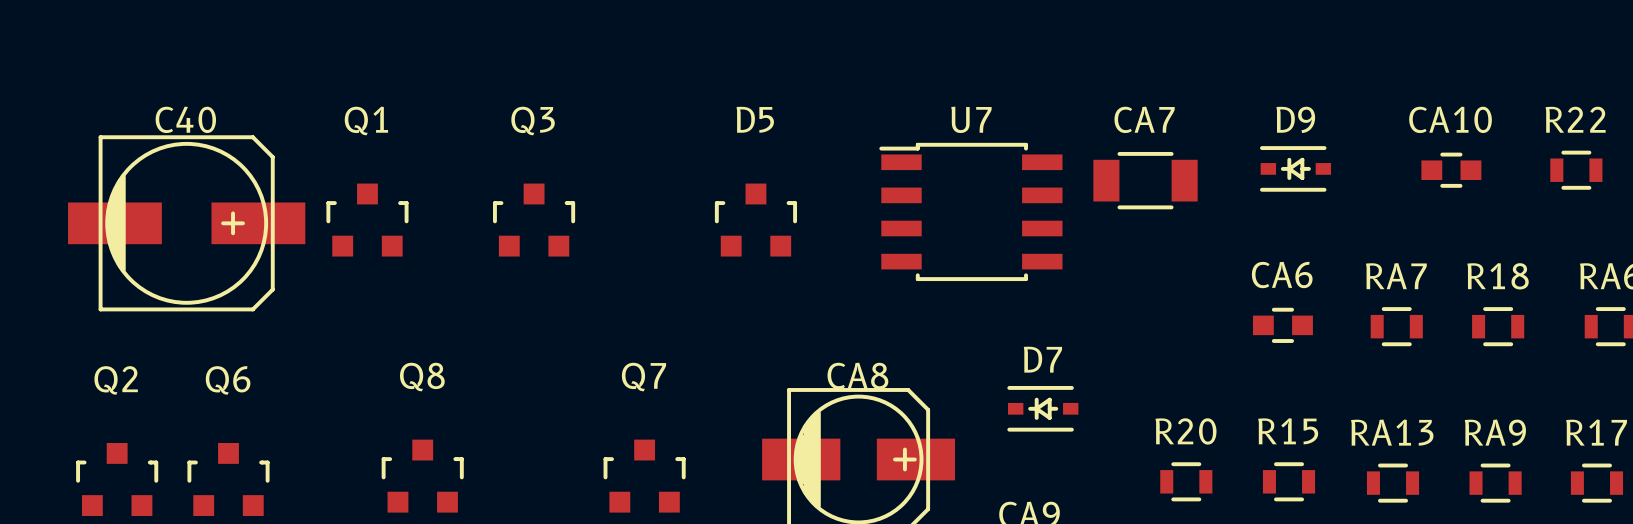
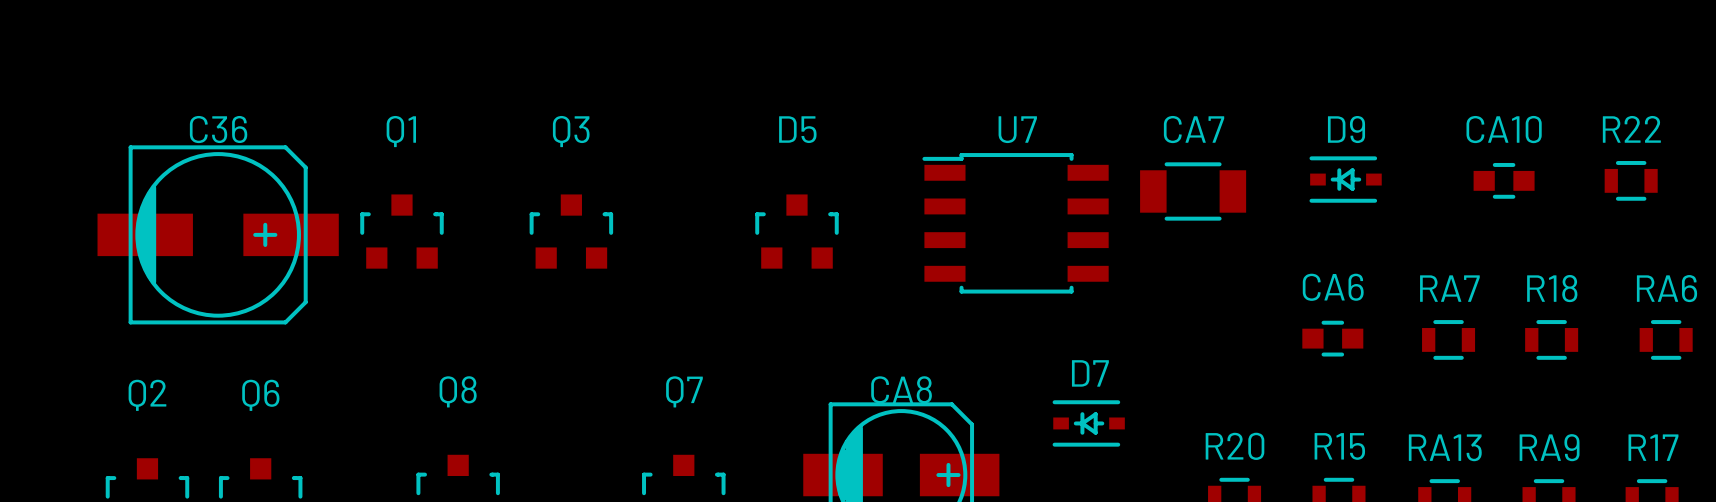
C40 name: C40 (185, 119) -> C36 (218, 129)

